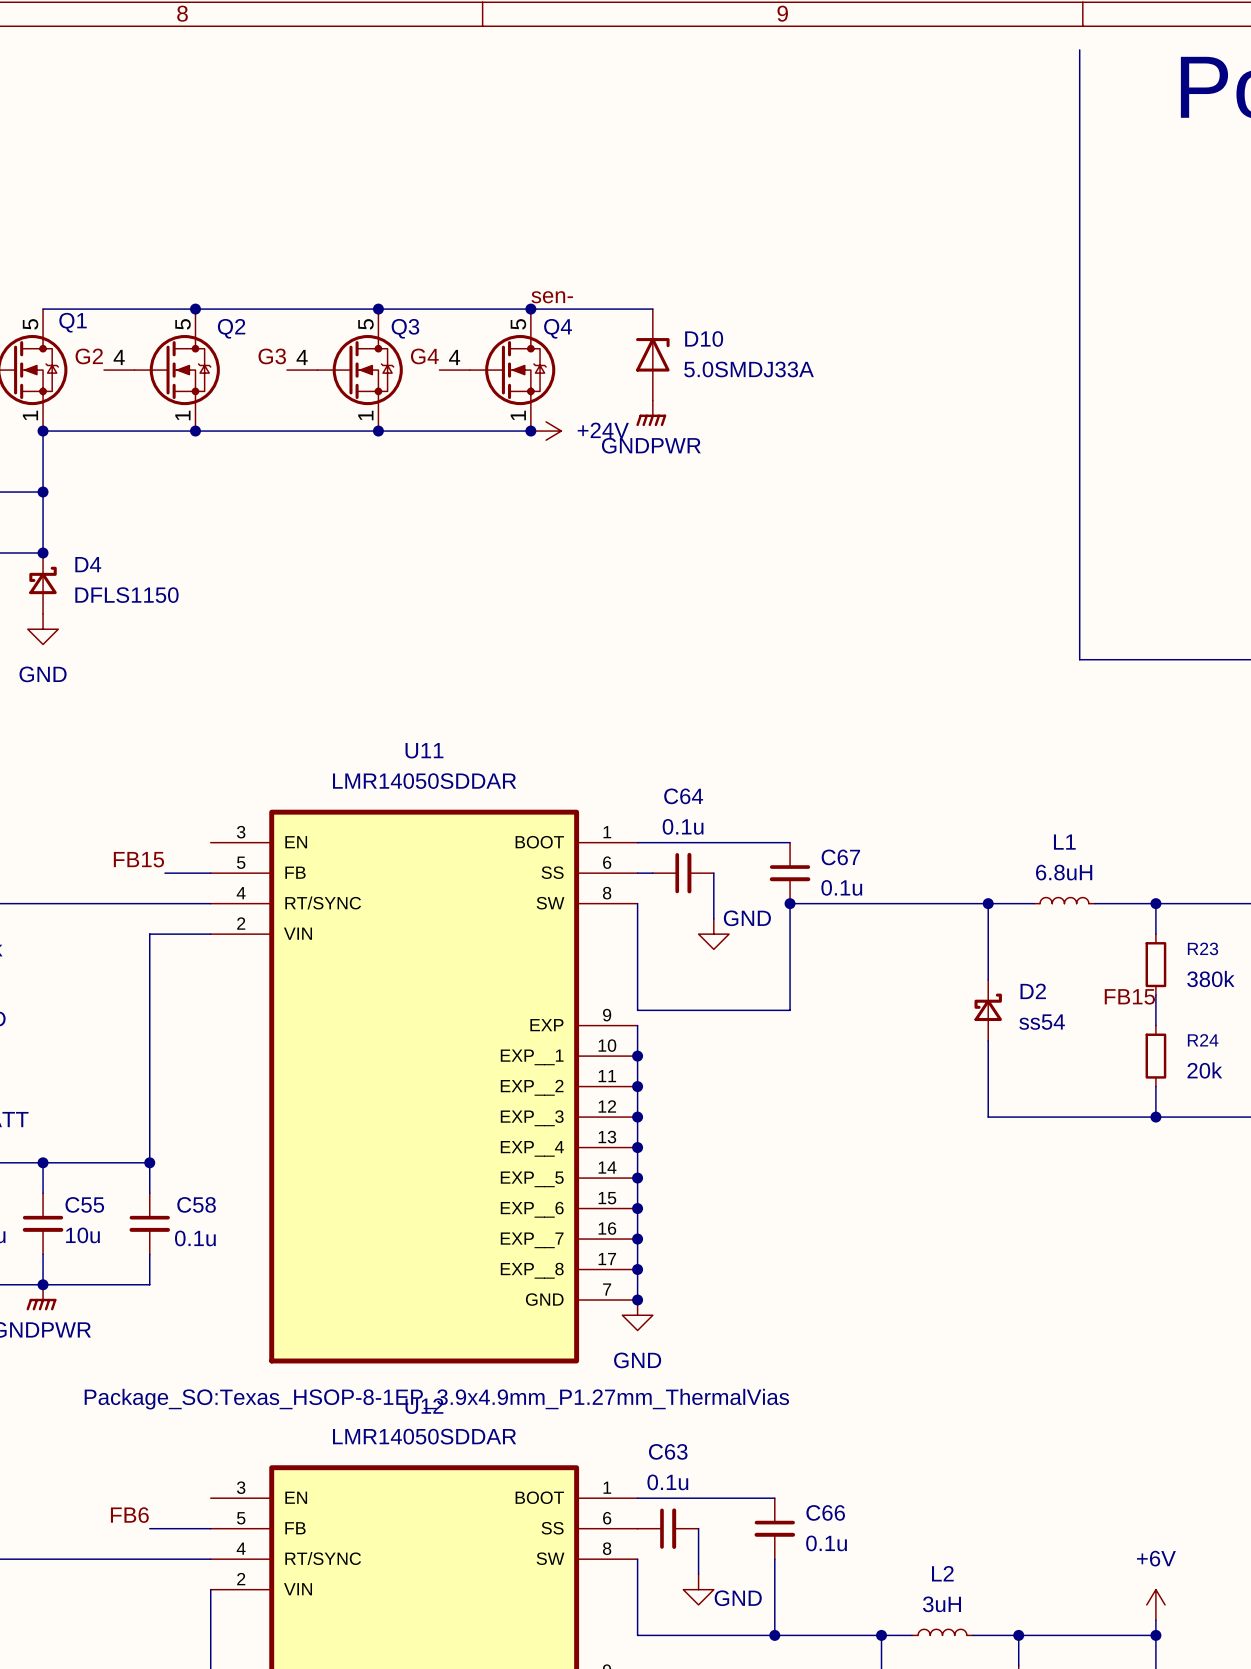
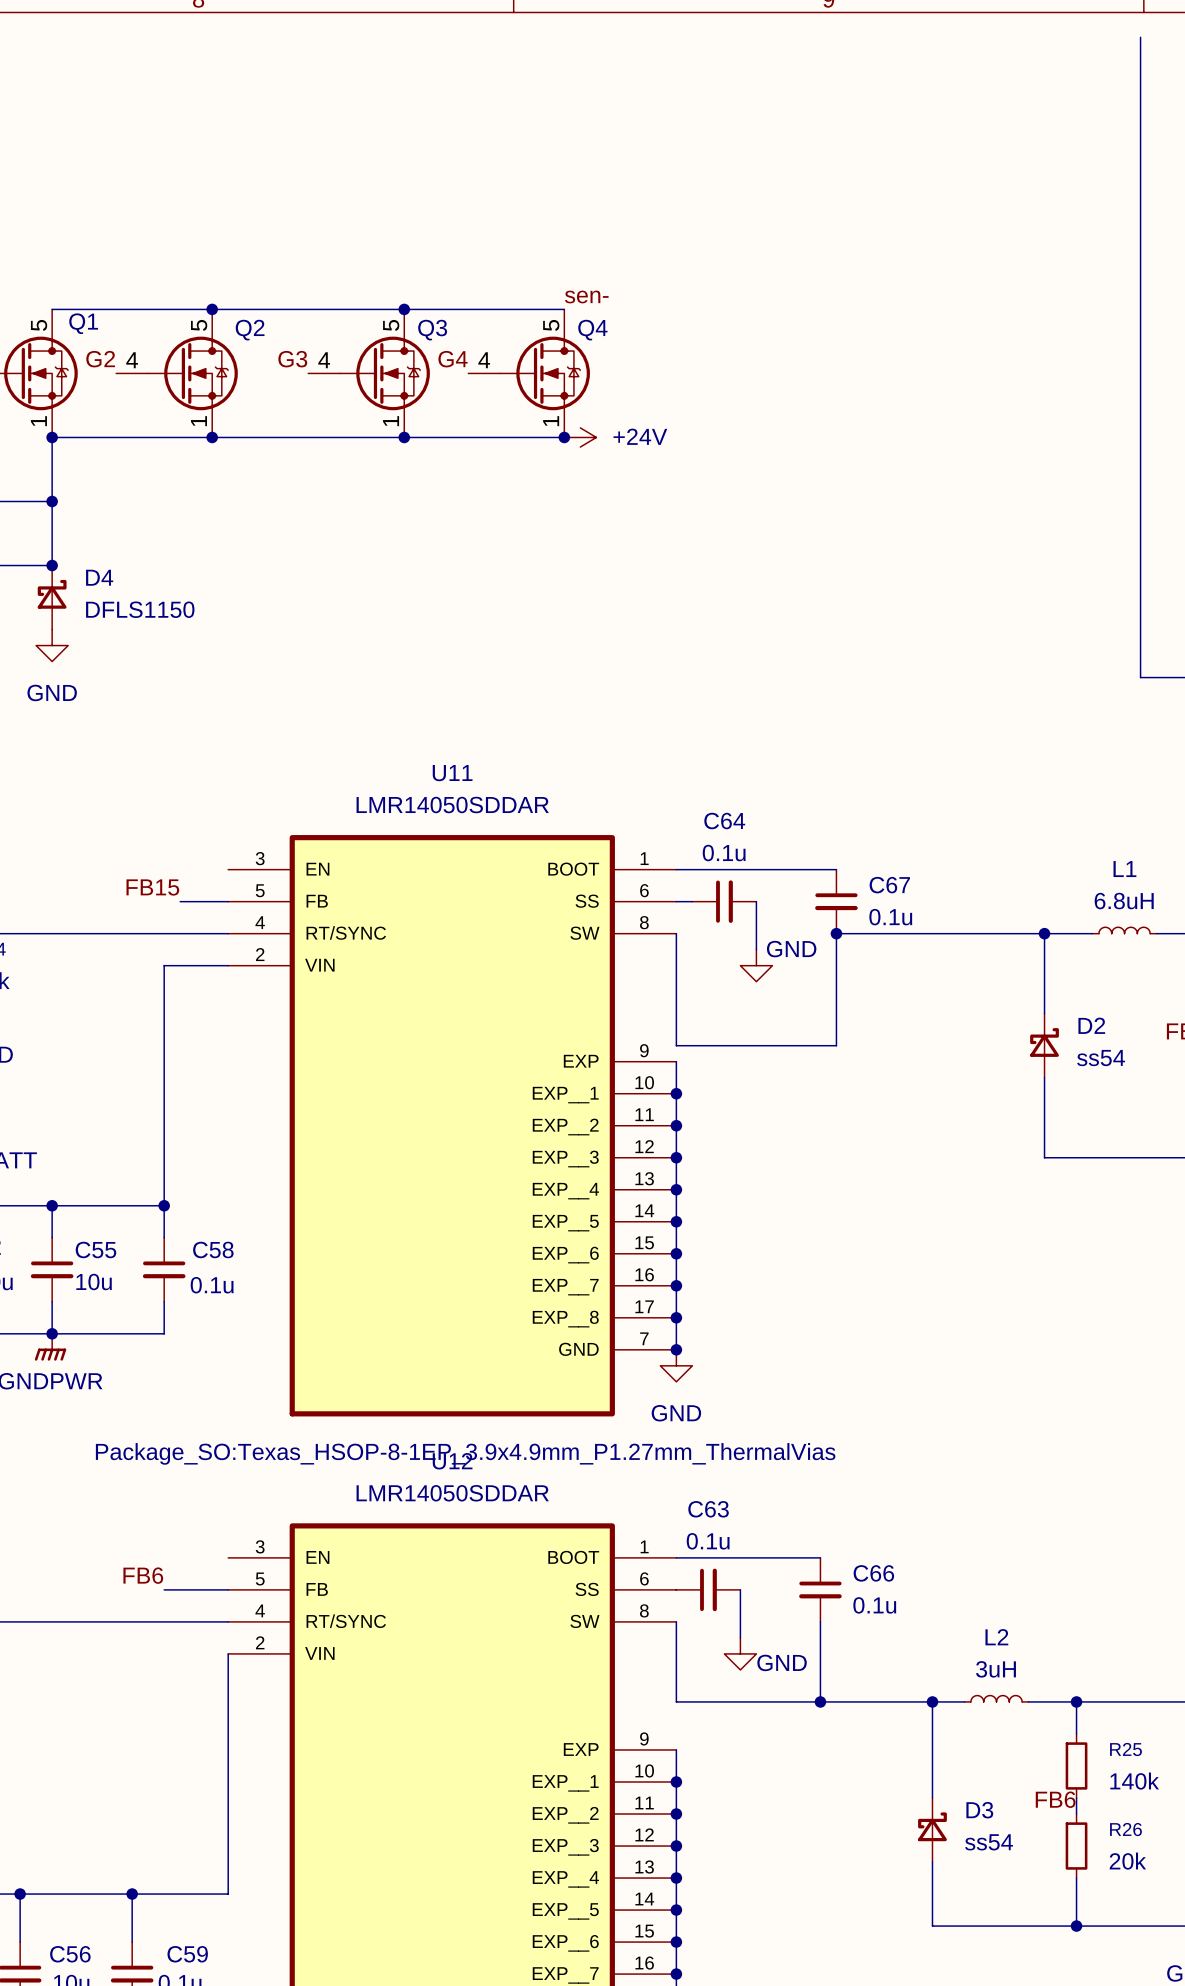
wire: (530, 309) (652, 309) -> none
junction: (530, 309) -> none
D10: 5.0SMDJ33A (652, 354) -> none
power symbol: GNDPWR (651, 413) -> none

